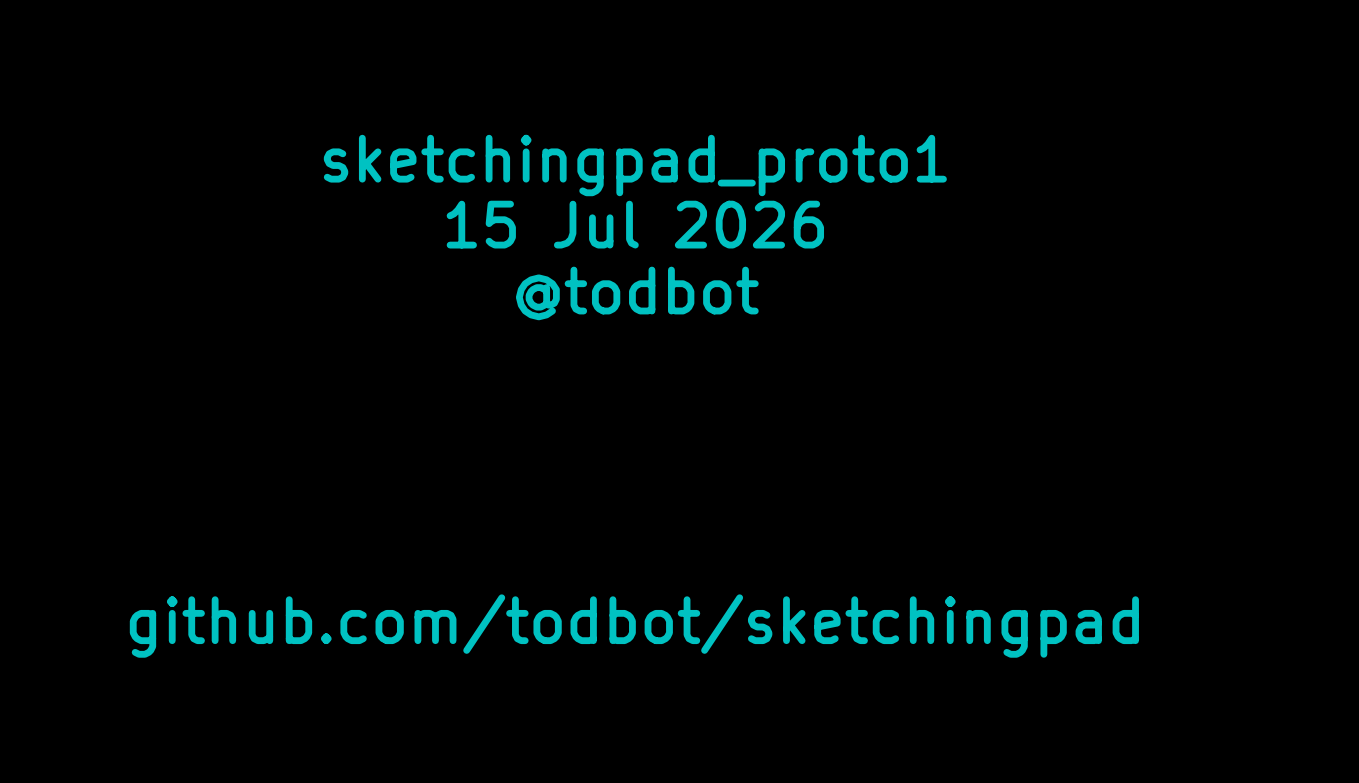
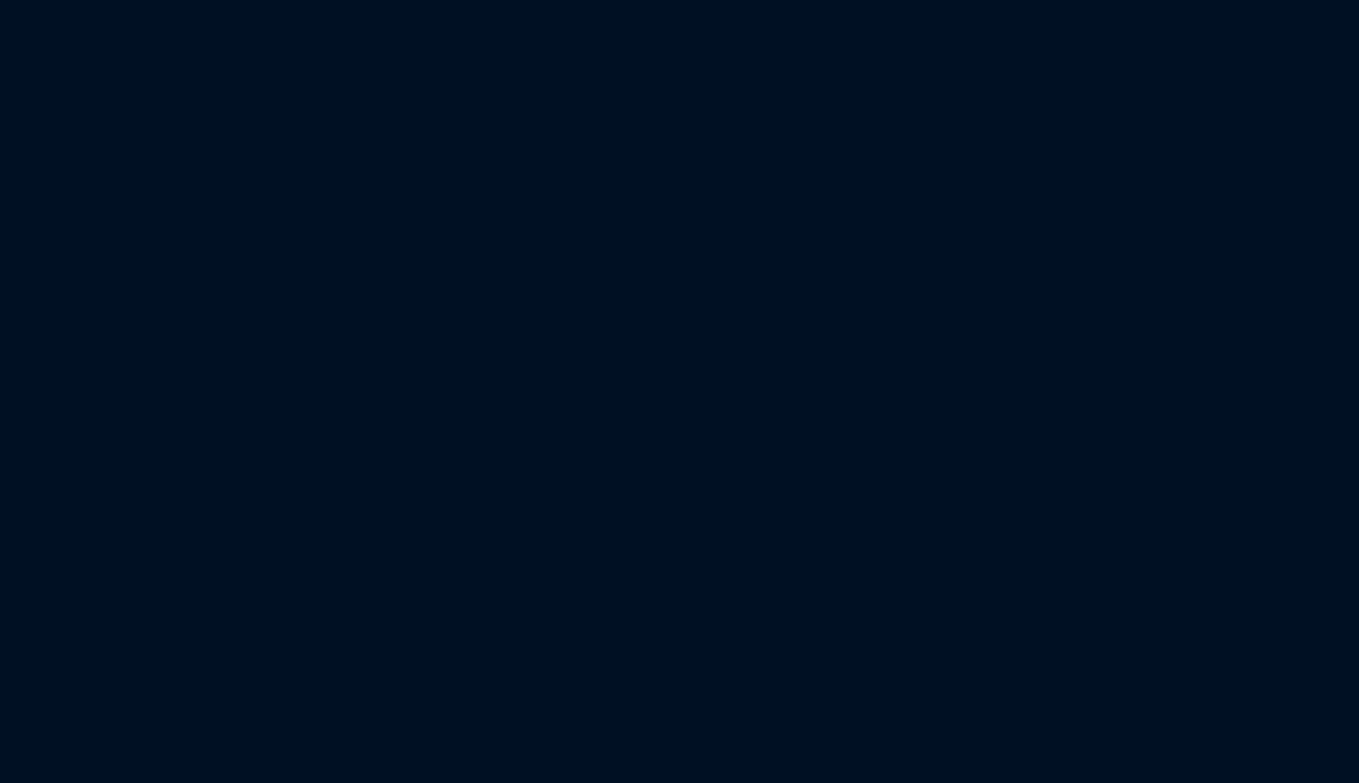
text: sketchingpad_proto1 (635, 165) -> none
text: 15 Jul 2026 (635, 224) -> none
text: @todbot (637, 293) -> none
text: github.com/todbot/sketchingpad (634, 626) -> none

